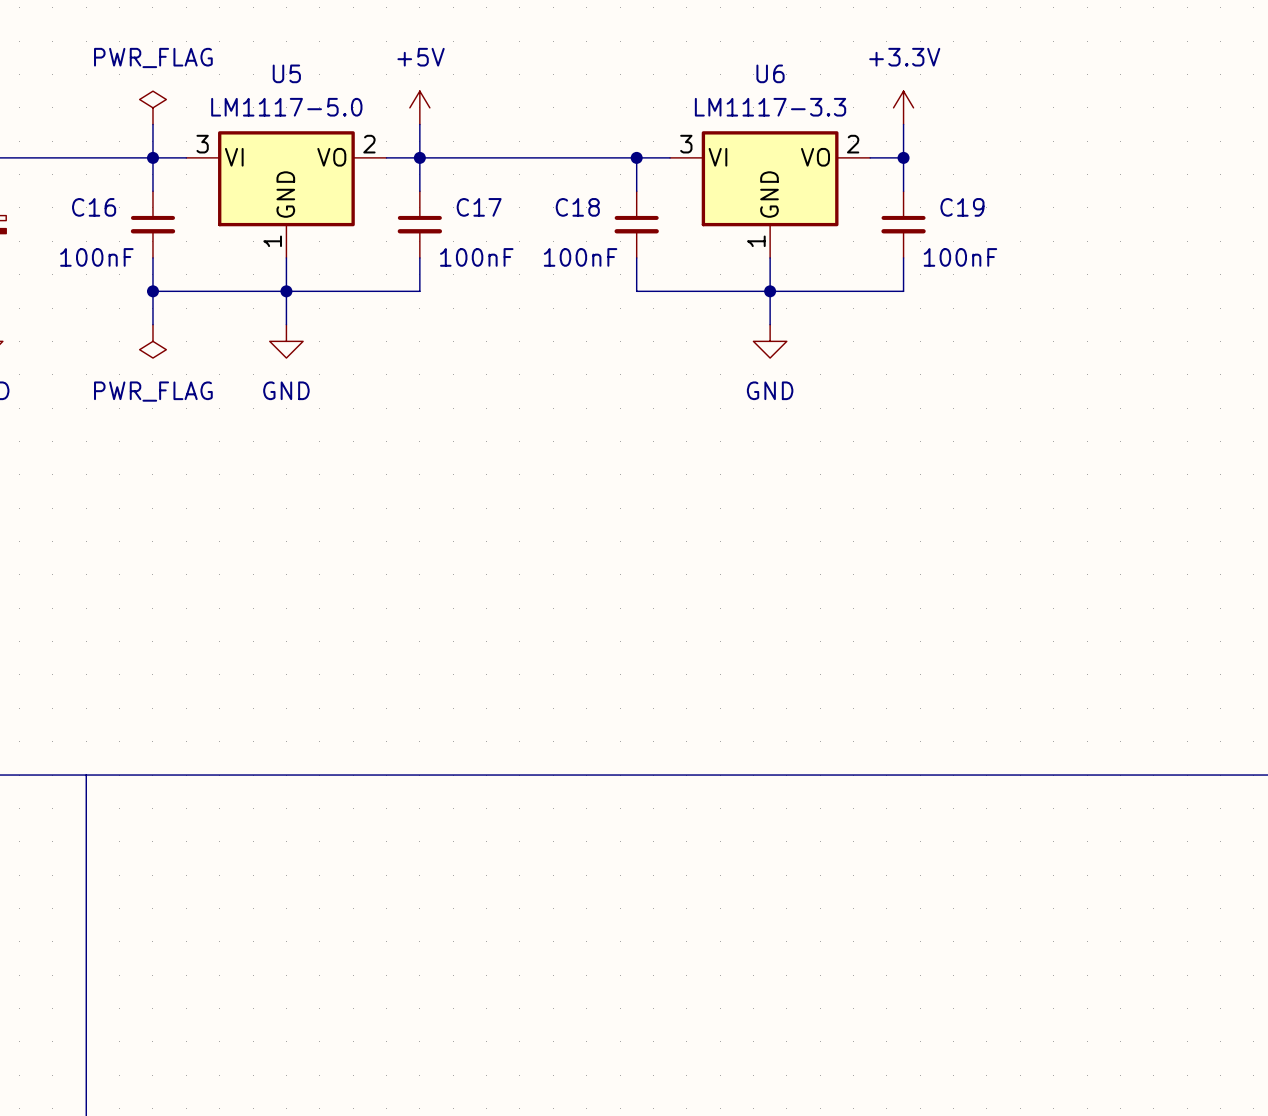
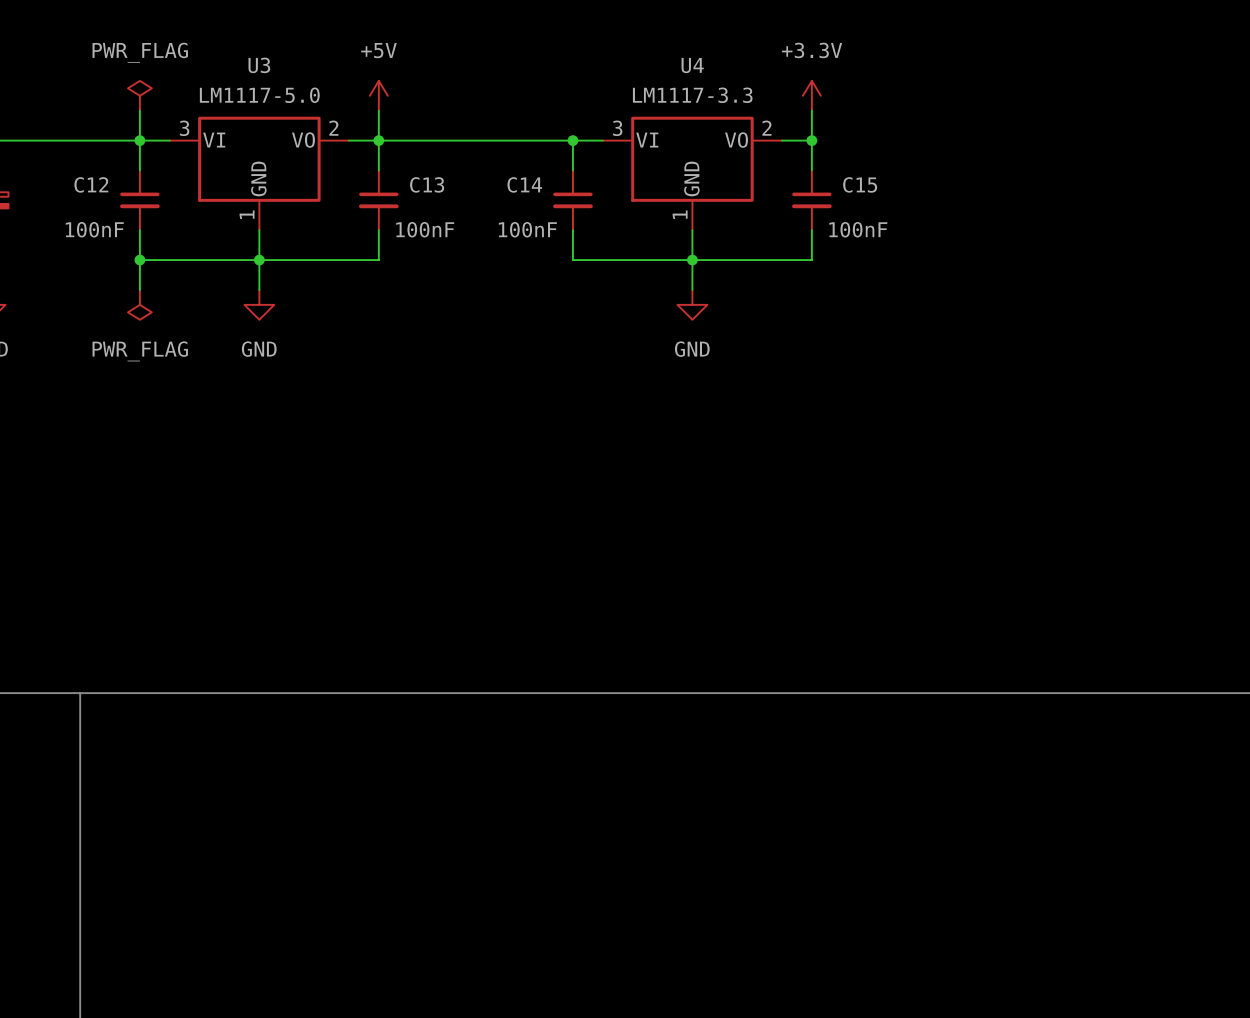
U5 name: U5 (286, 73) -> U3 (259, 65)
U6 name: U6 (770, 73) -> U4 (692, 65)
C16 name: C16 (94, 207) -> C12 (91, 184)
C17 name: C17 (479, 207) -> C13 (427, 184)
C18 name: C18 (577, 207) -> C14 (524, 184)
C19 name: C19 (962, 207) -> C15 (860, 184)

